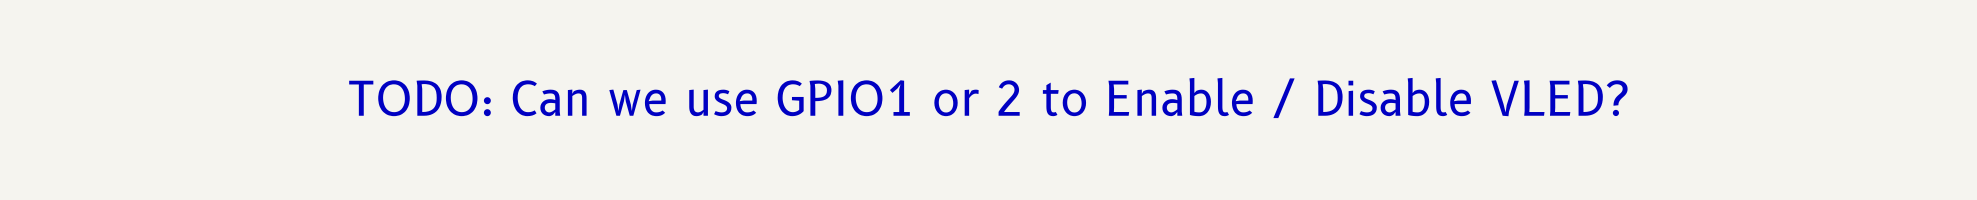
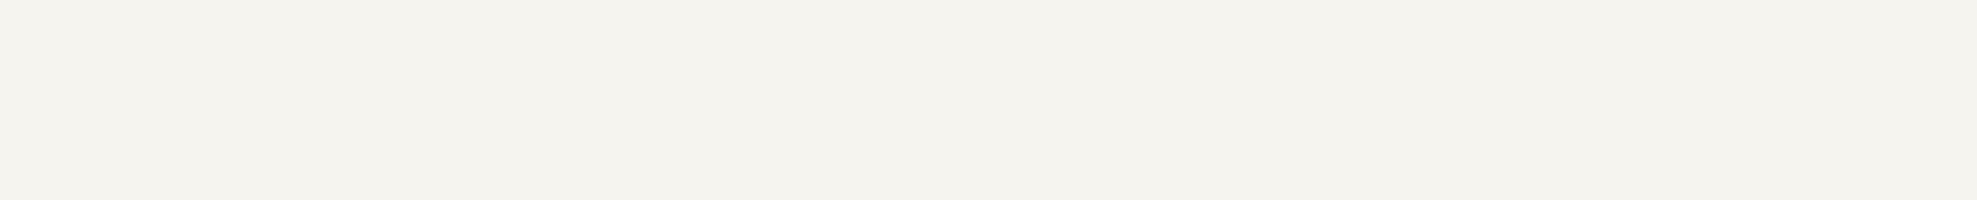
text: TODO: Can we use GPIO1 or 2 to Enable / Disable VLED? (988, 98) -> none

